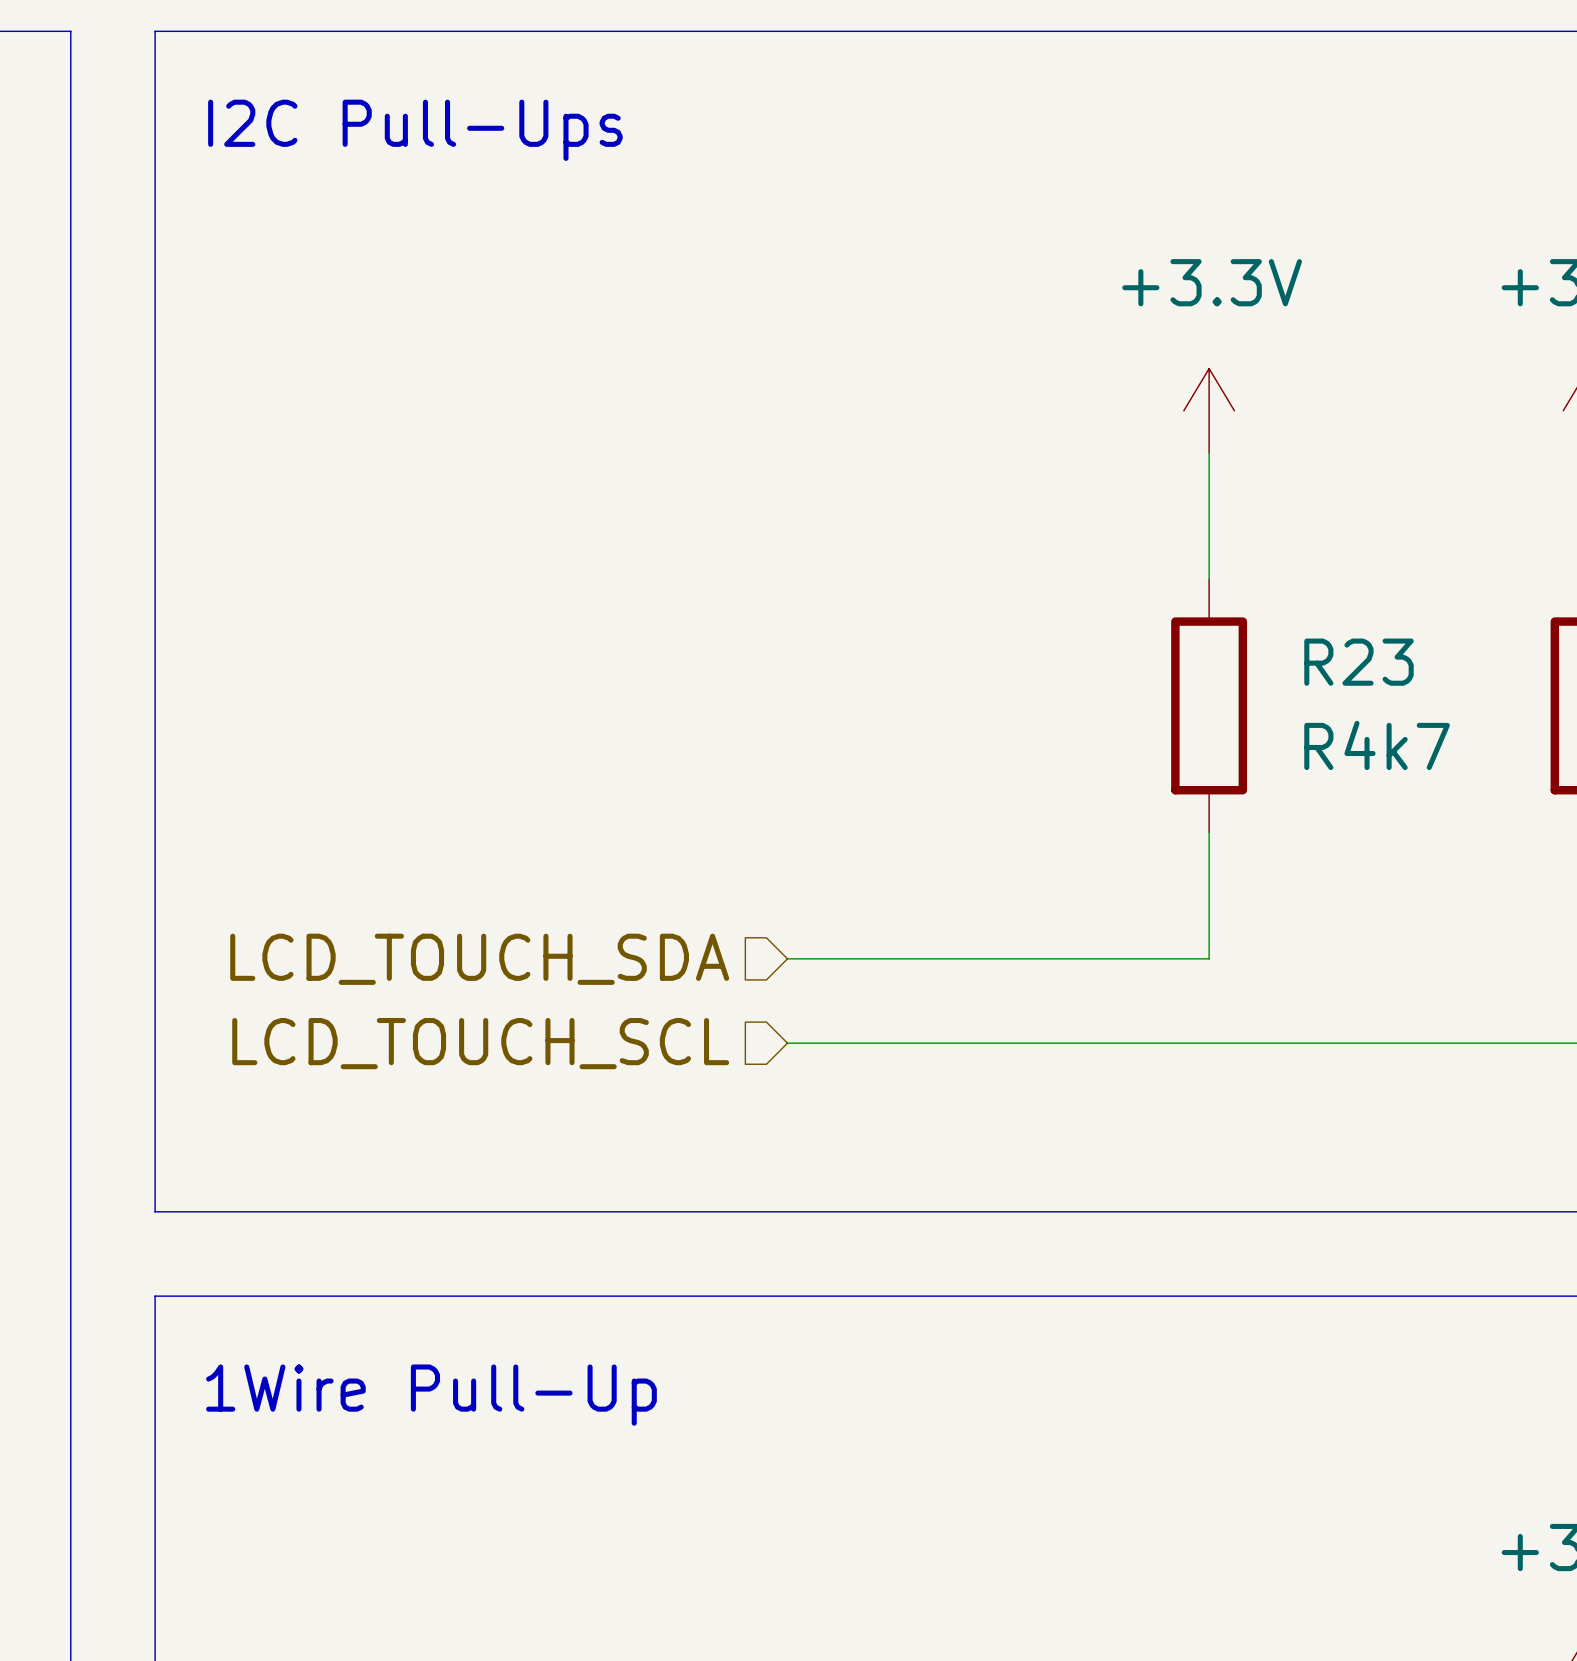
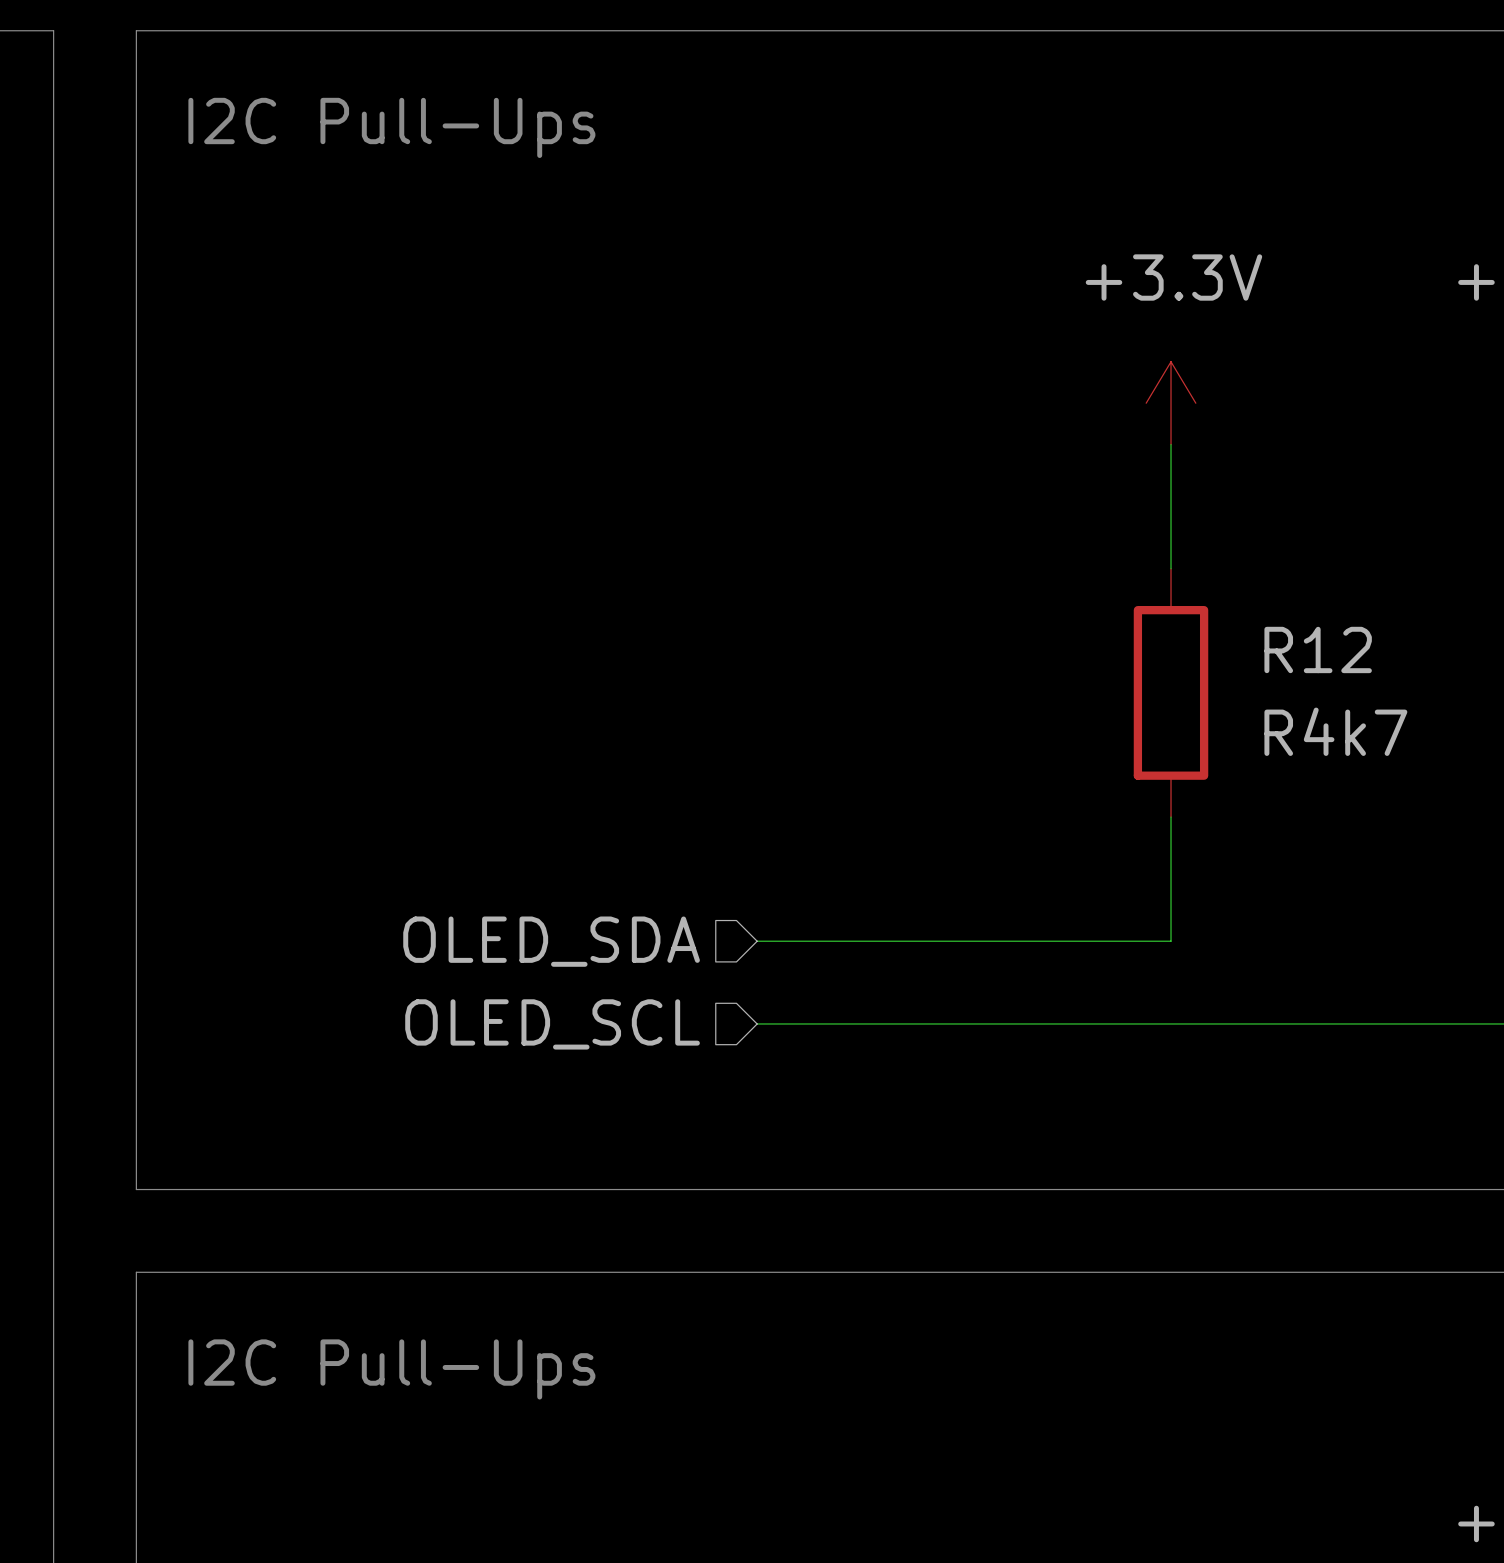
R23 name: R23 (1359, 662) -> R12 (1318, 649)
hierarchical label: LCD_TOUCH_SDA (479, 959) -> OLED_SDA (551, 941)
hierarchical label: LCD_TOUCH_SCL (480, 1043) -> OLED_SCL (552, 1024)
text: 1Wire Pull-Up (431, 1395) -> I2C Pull-Ups (391, 1369)

